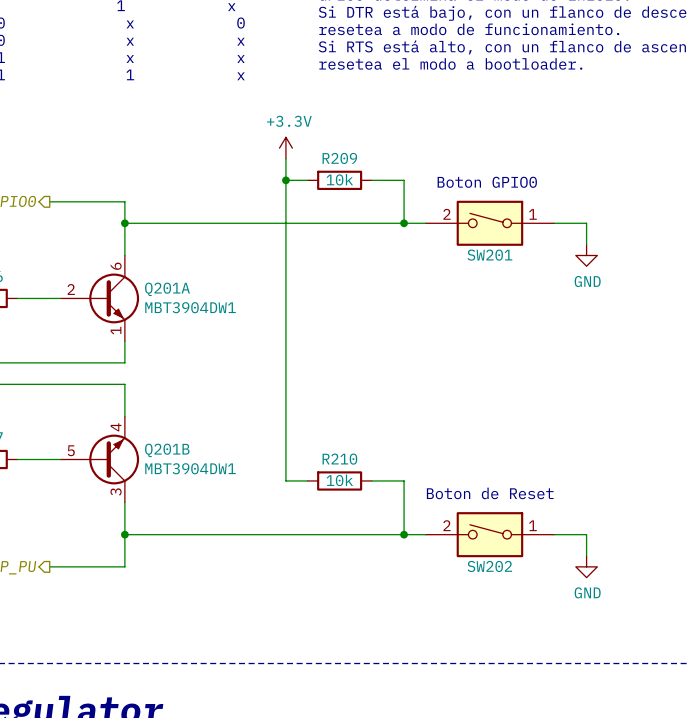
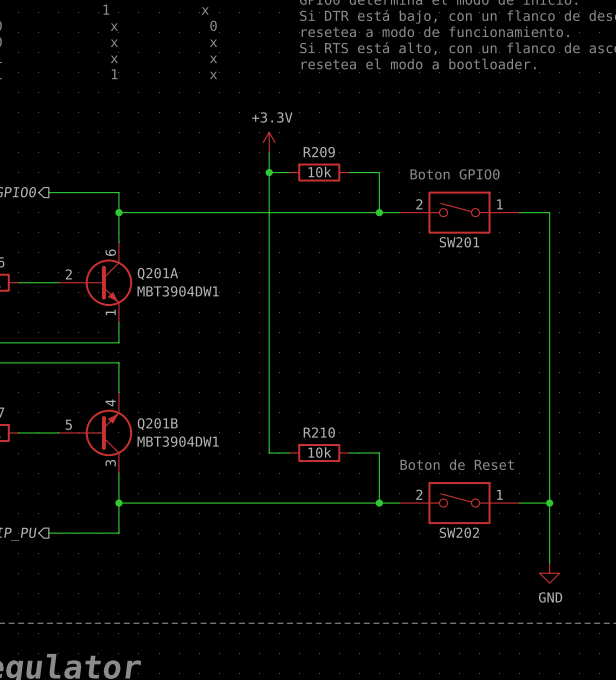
wire: none -> (549, 232) (549, 503)
power symbol: GND (586, 255) -> none
junction: none -> (549, 503)
wire: none -> (549, 523) (549, 563)
power symbol position: GND (586, 566) -> GND (549, 573)

